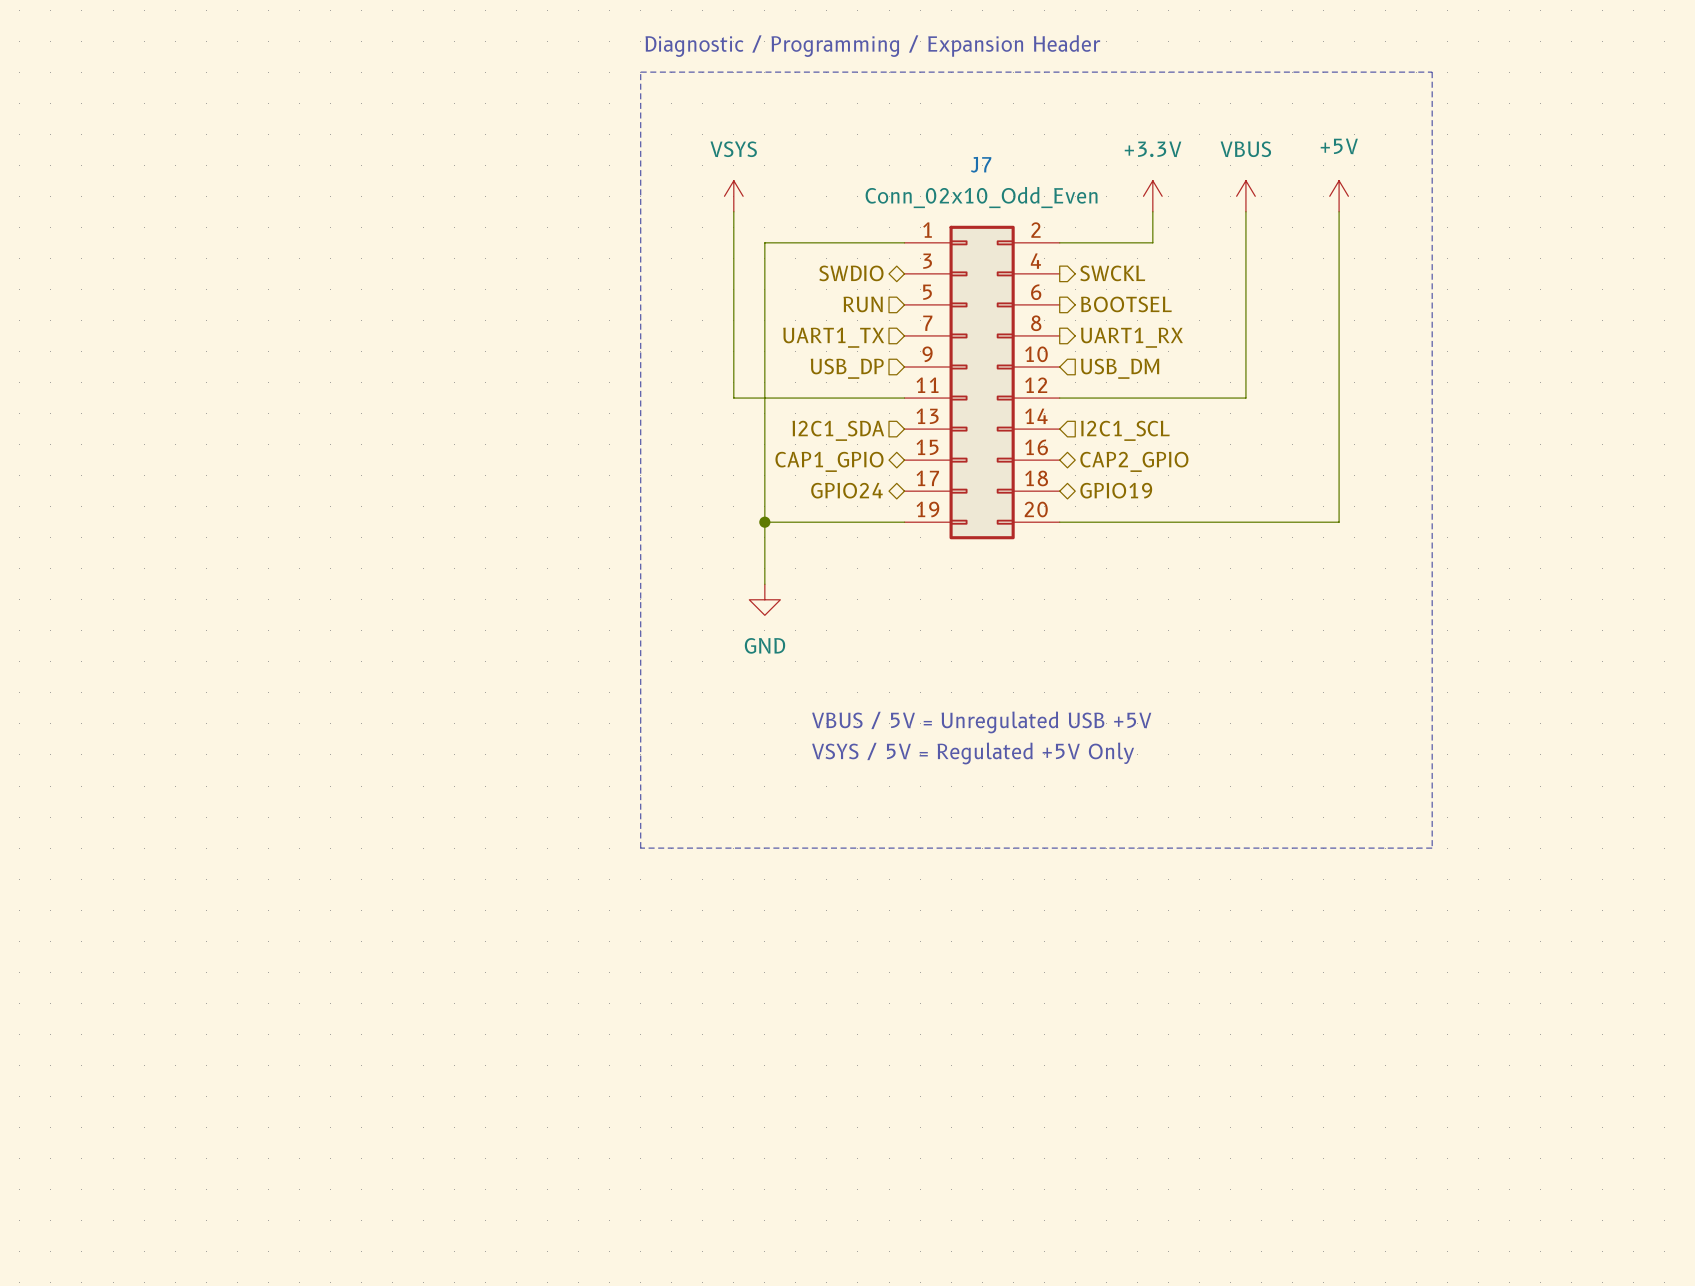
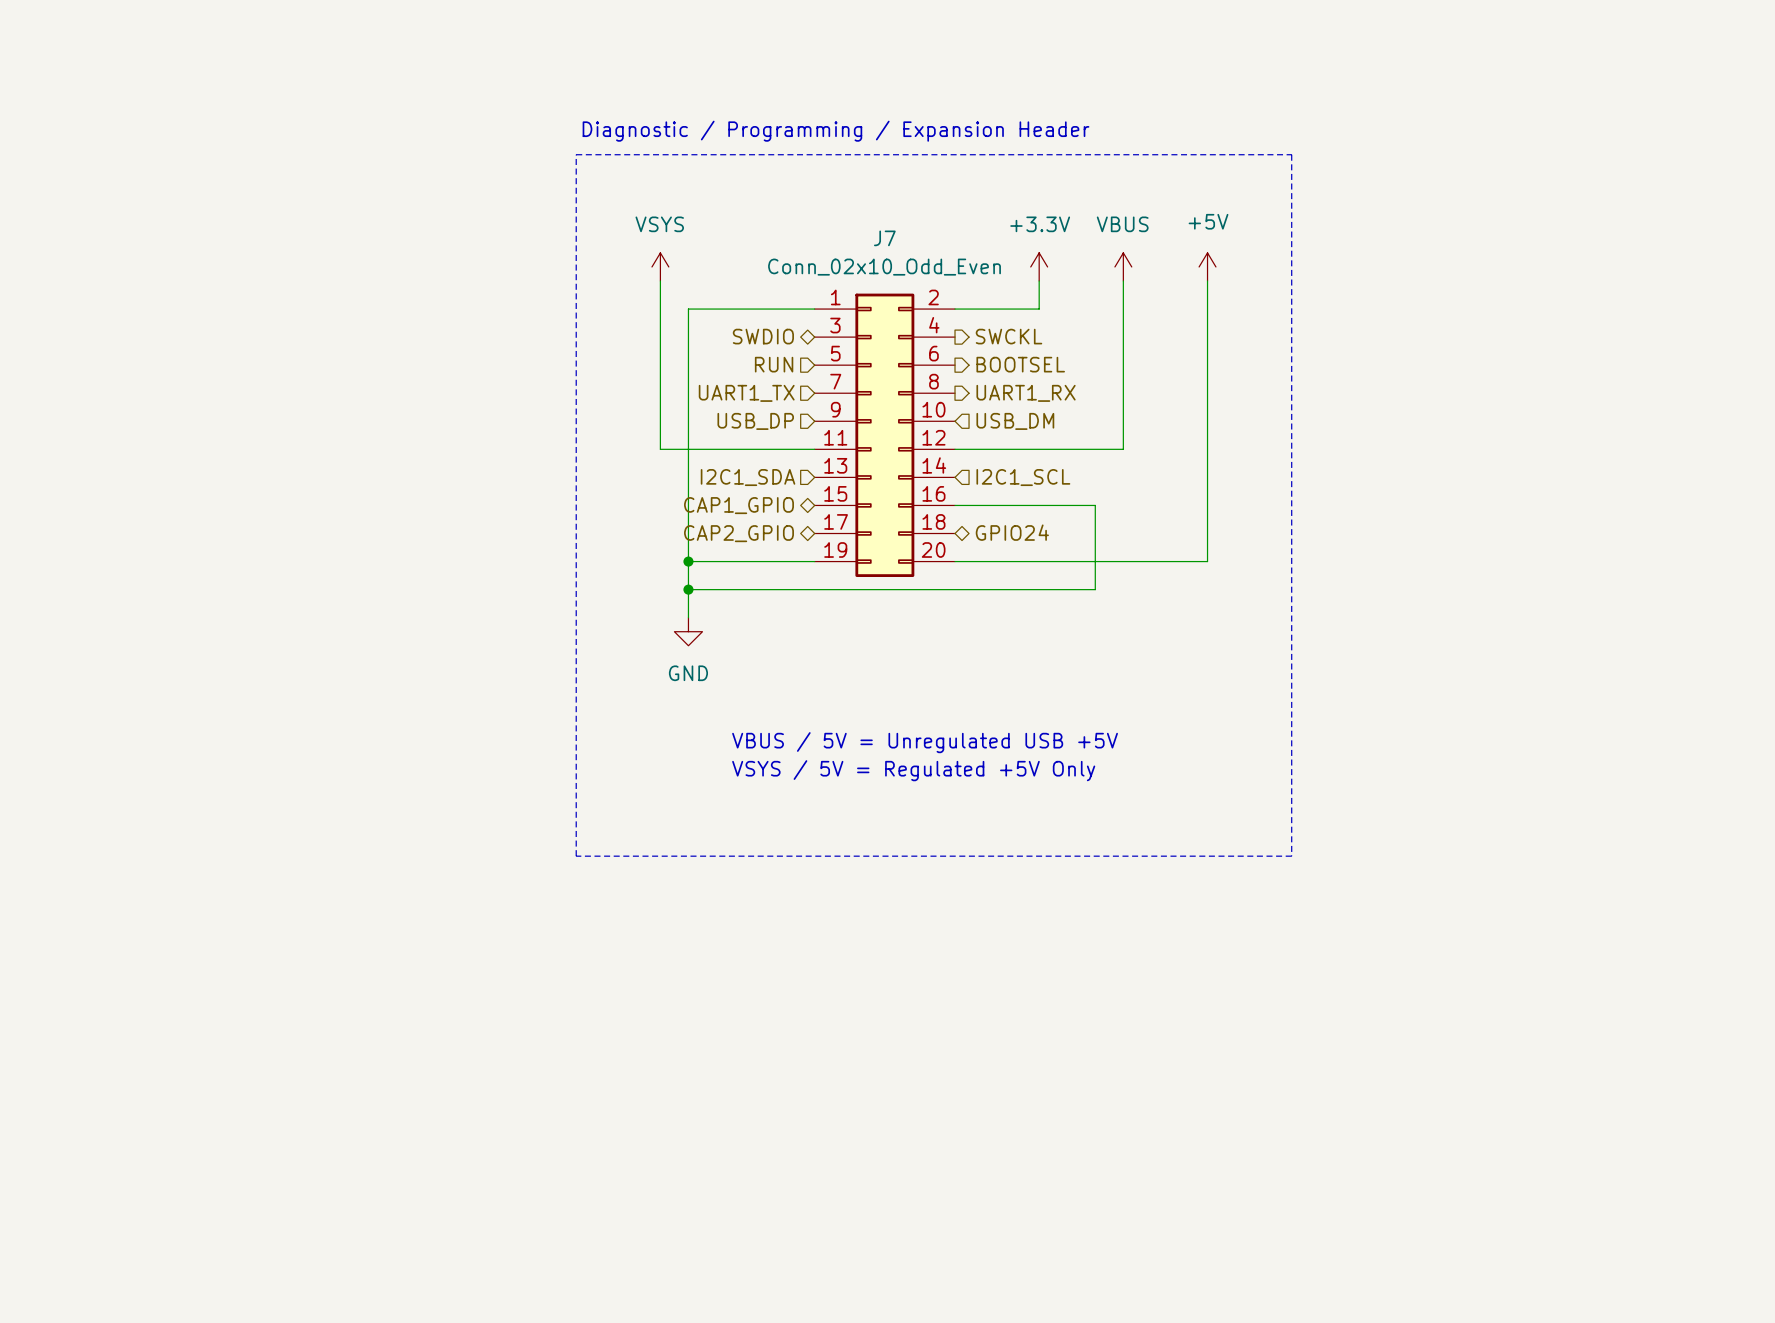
wire: none -> (955, 505) (1095, 505) (1095, 589) (688, 589)
hierarchical label: CAP2_GPIO (1134, 461) -> none
hierarchical label: GPIO24 (846, 490) -> CAP2_GPIO (739, 533)
hierarchical label: GPIO19 (1116, 490) -> GPIO24 (1012, 532)
junction: none -> (688, 589)

